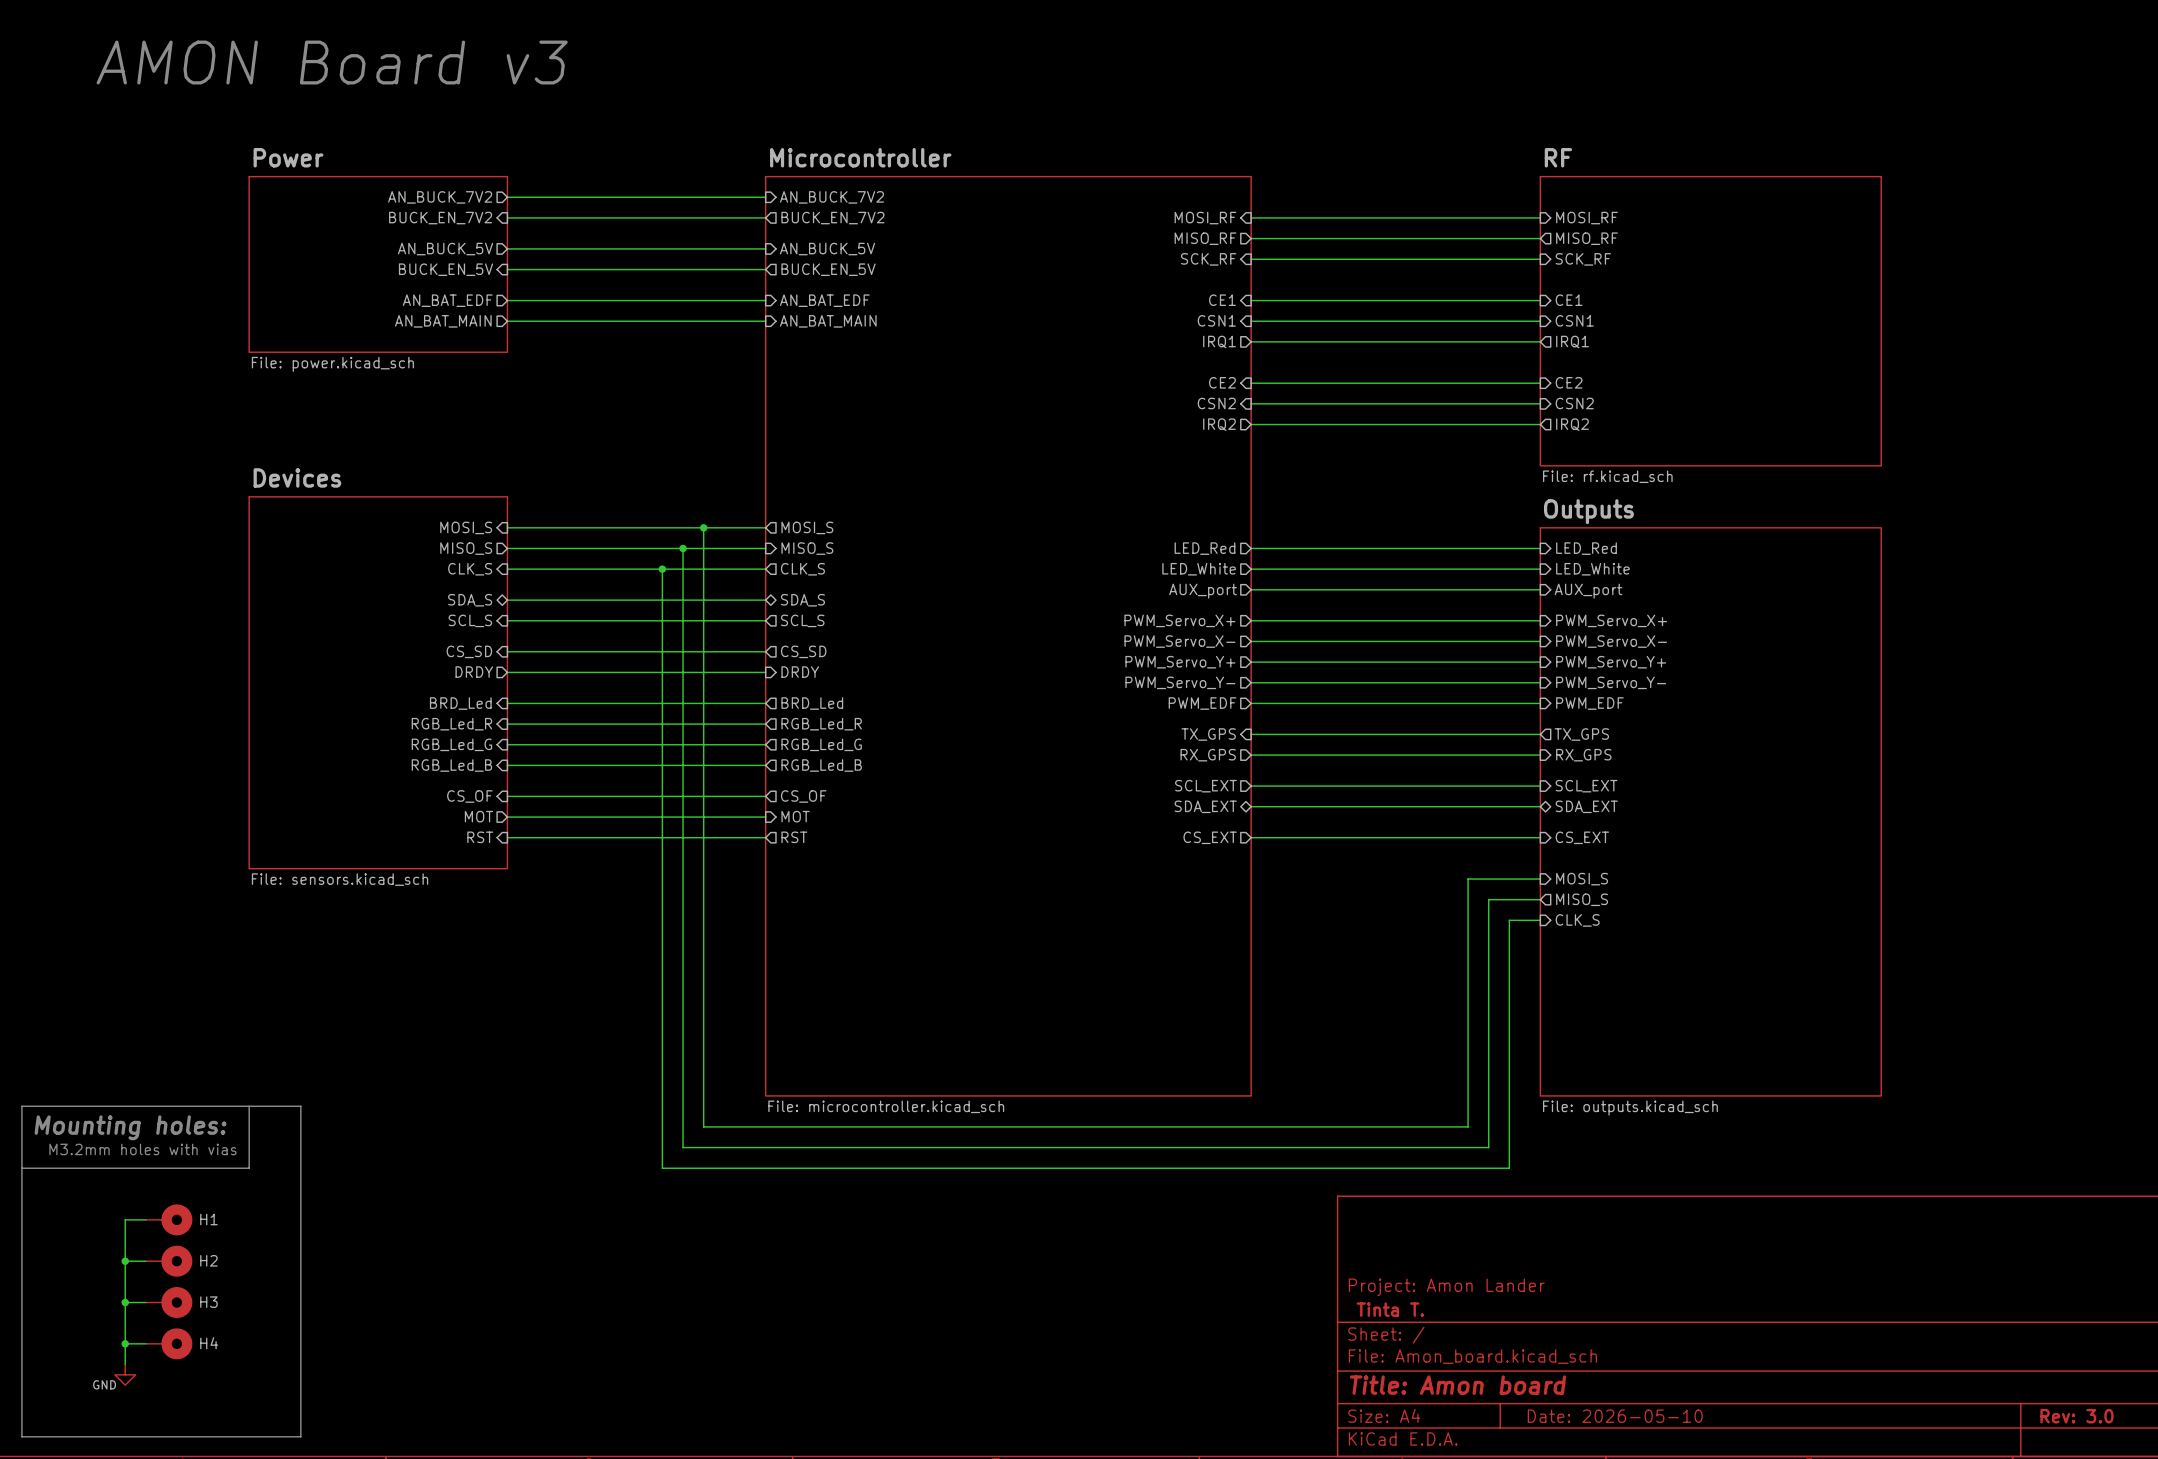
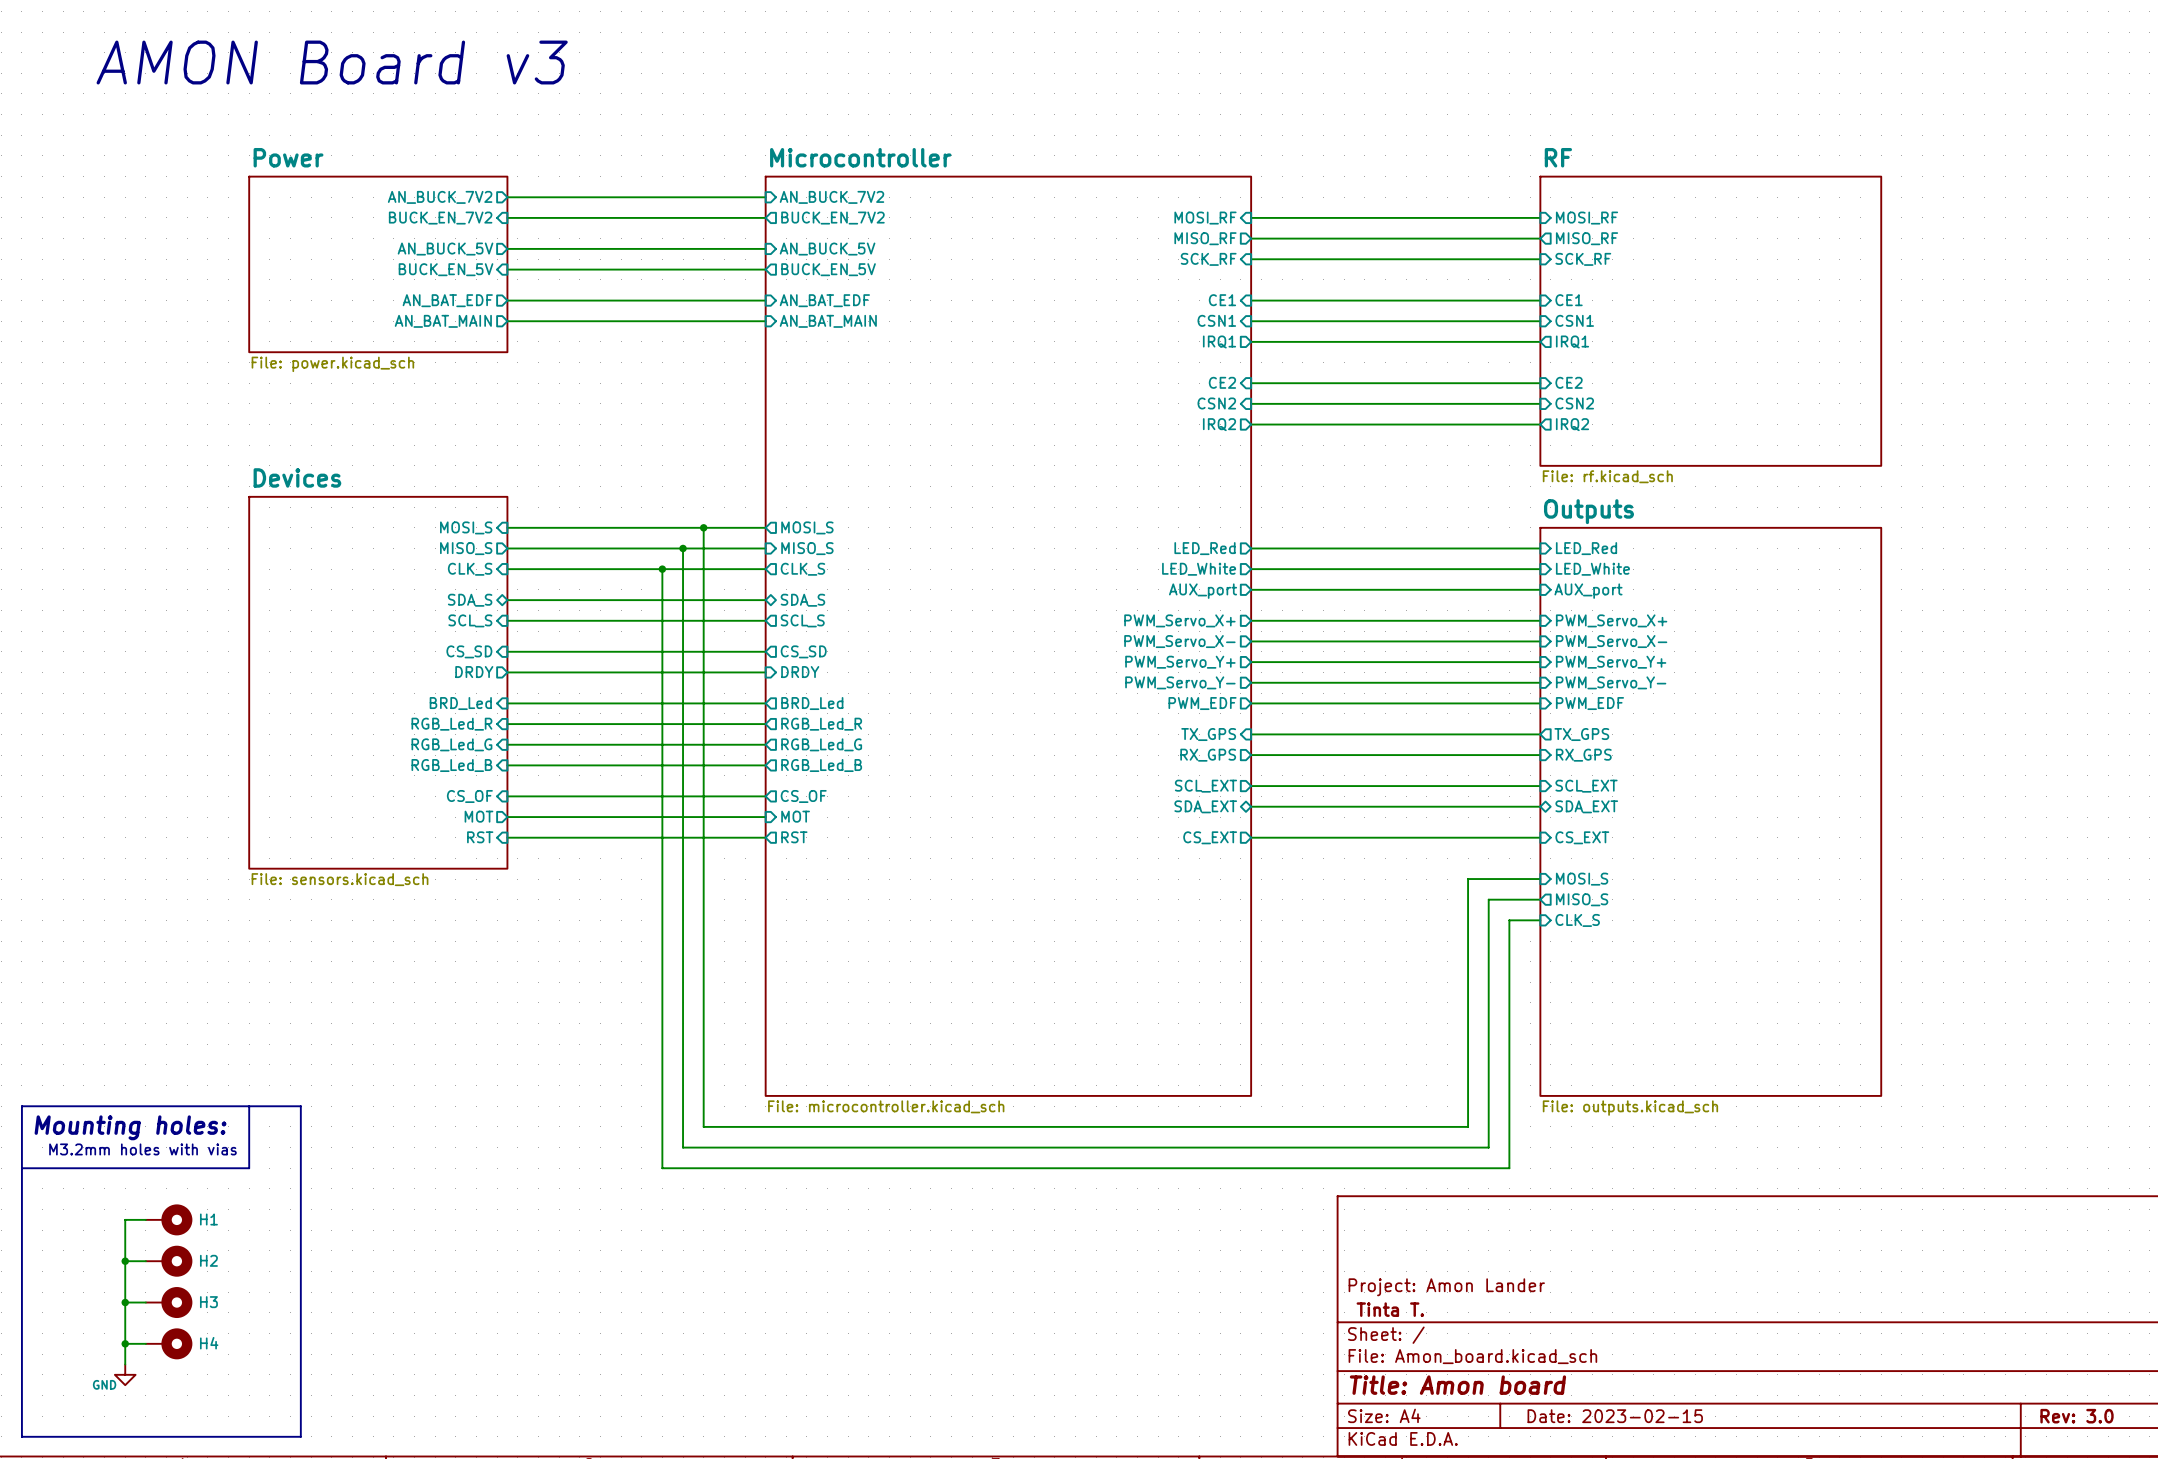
title block: Date: 2026-05-10 (1615, 1416) -> Date: 2023-02-15 (1615, 1416)

